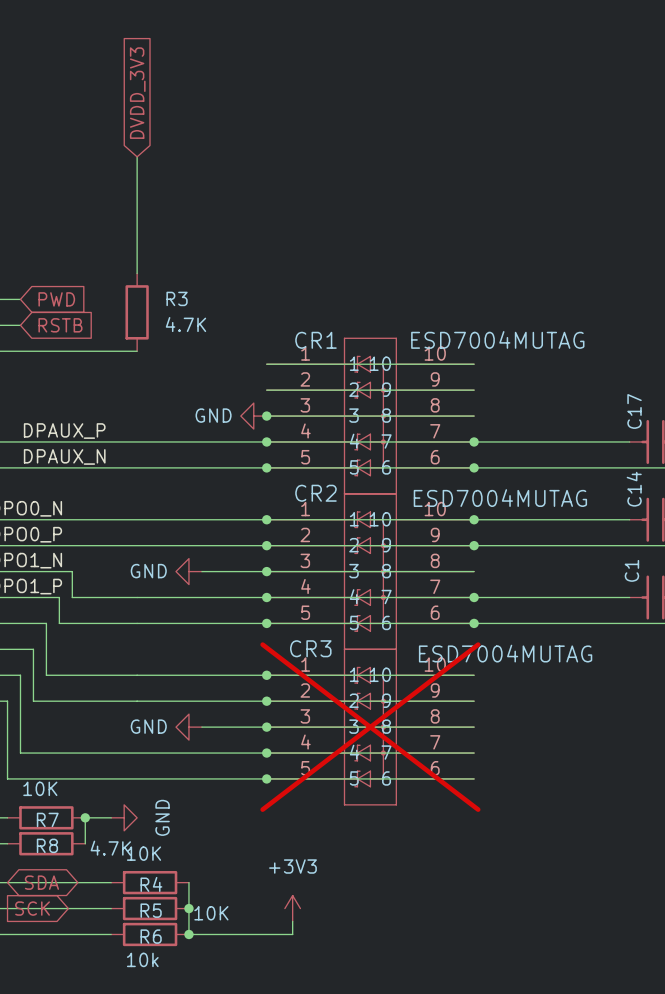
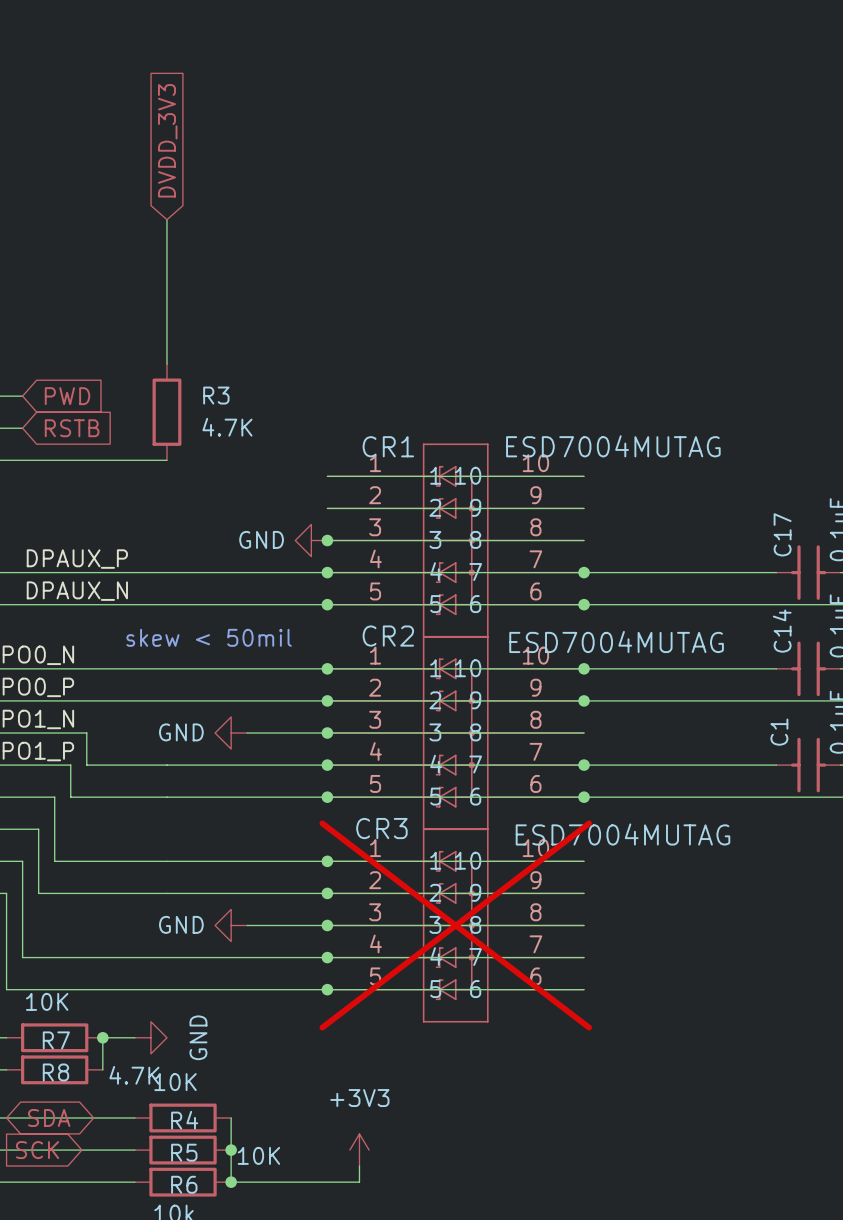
text: none -> skew < 50mil (209, 637)

